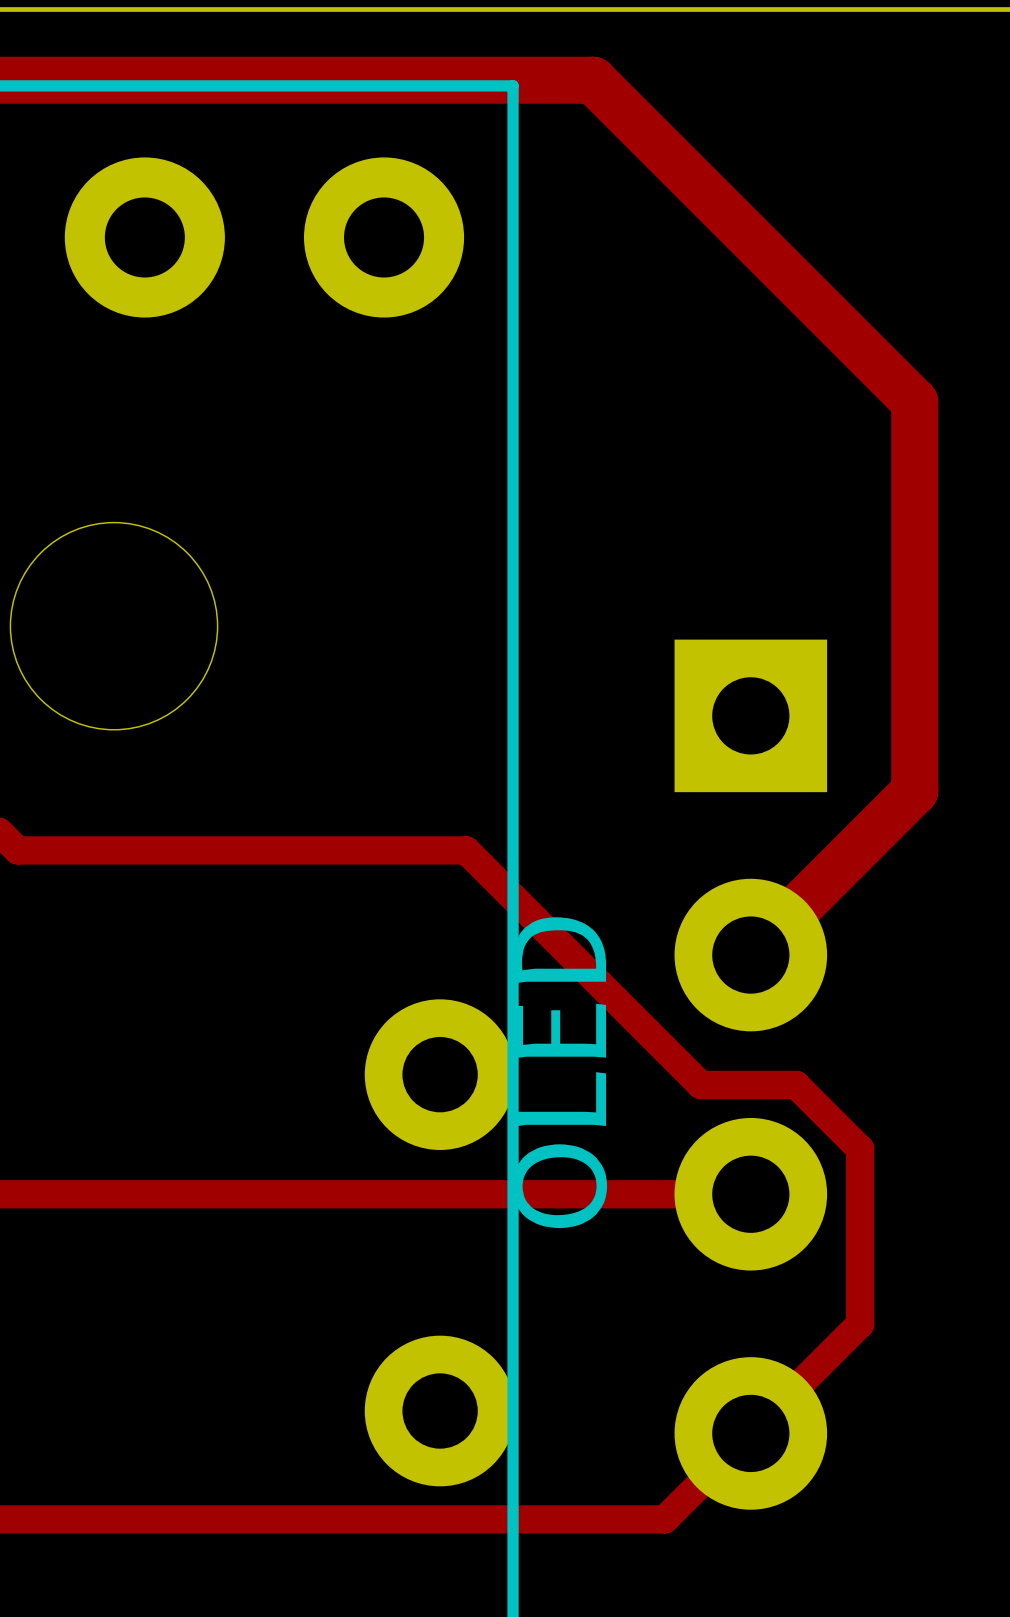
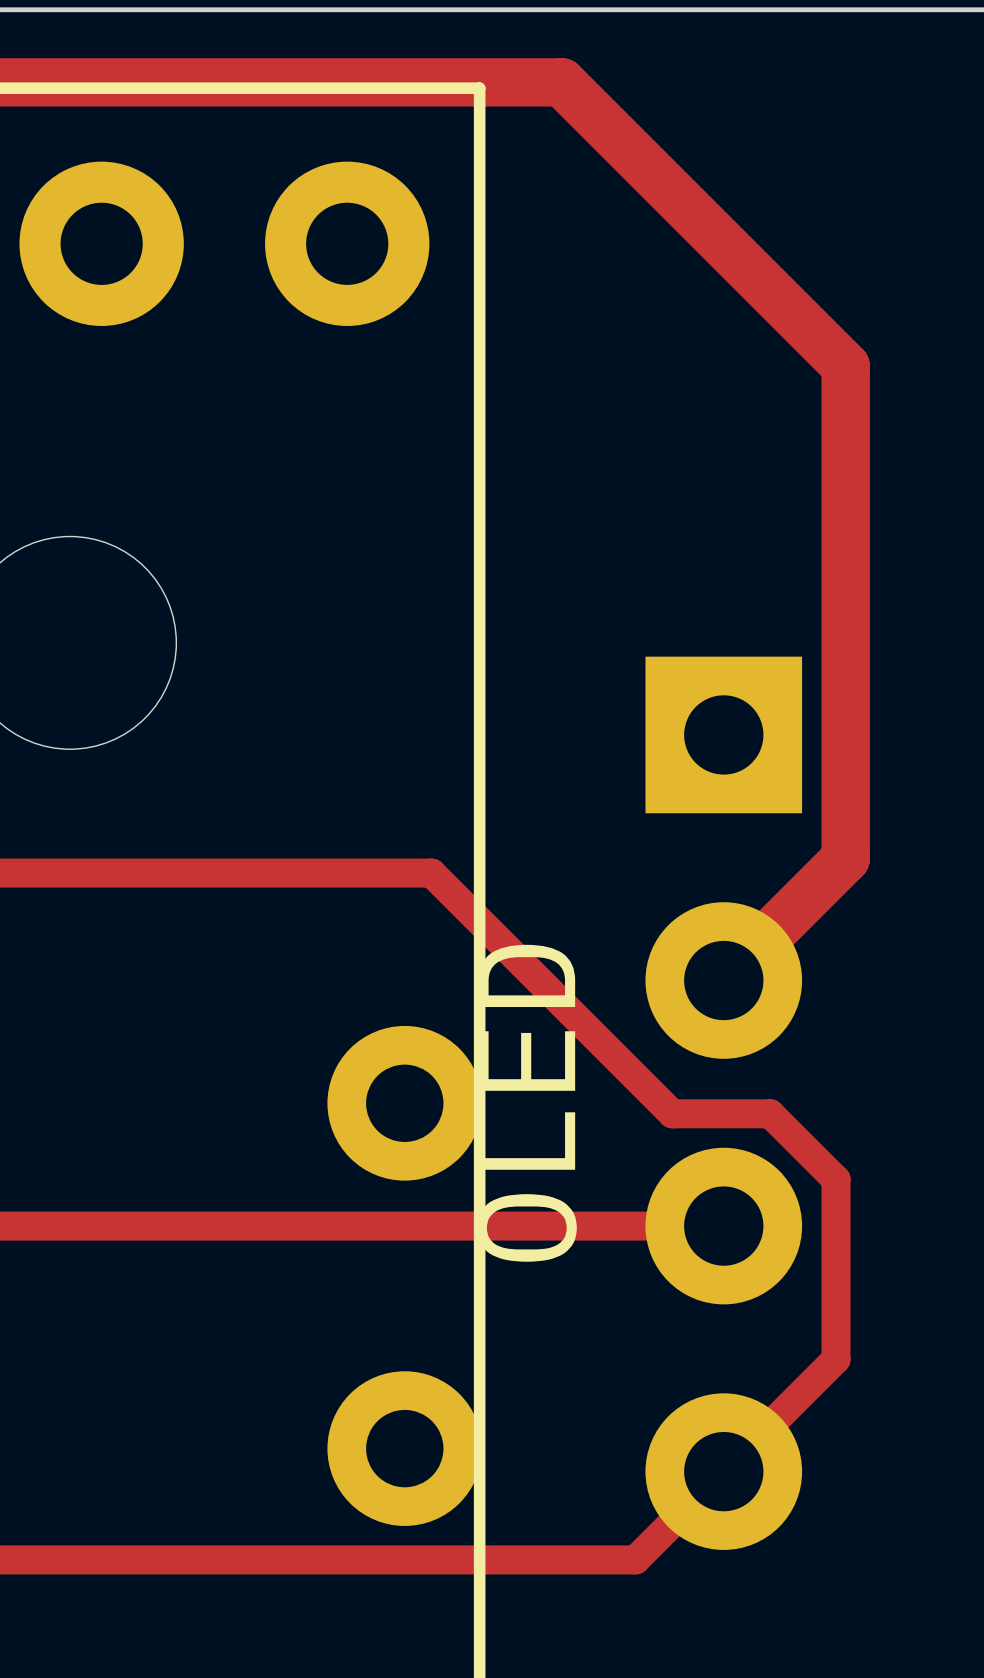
track: (869, 356) (914, 401) (914, 791) (869, 836) -> (845, 366) (845, 858)

